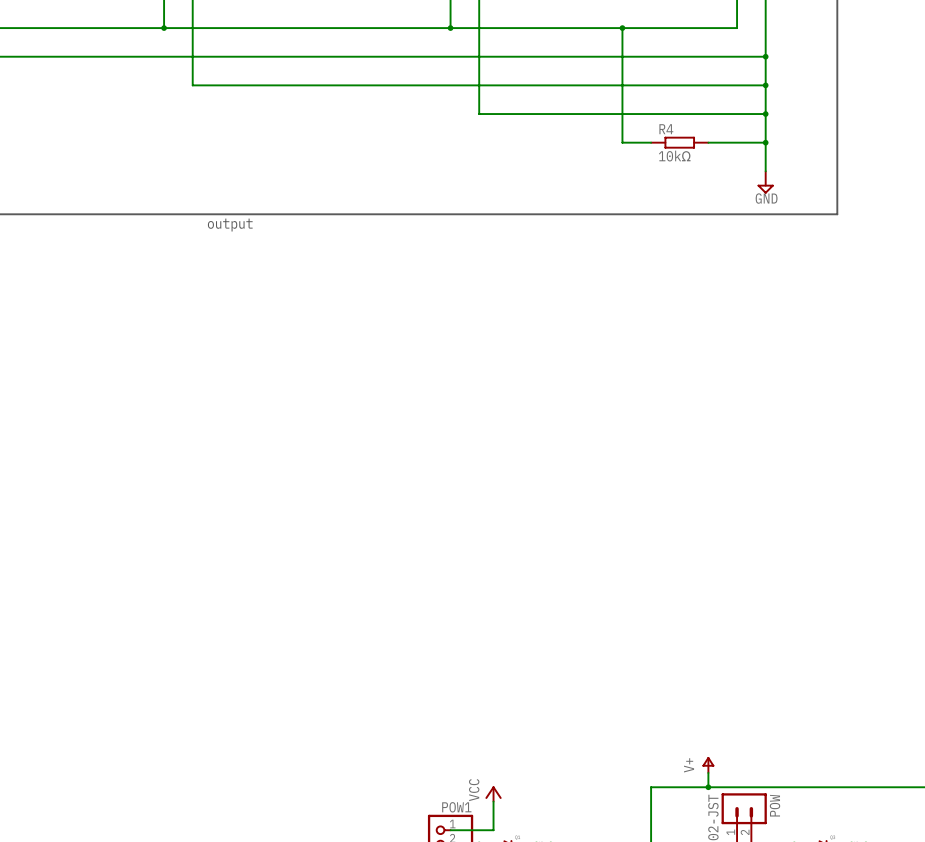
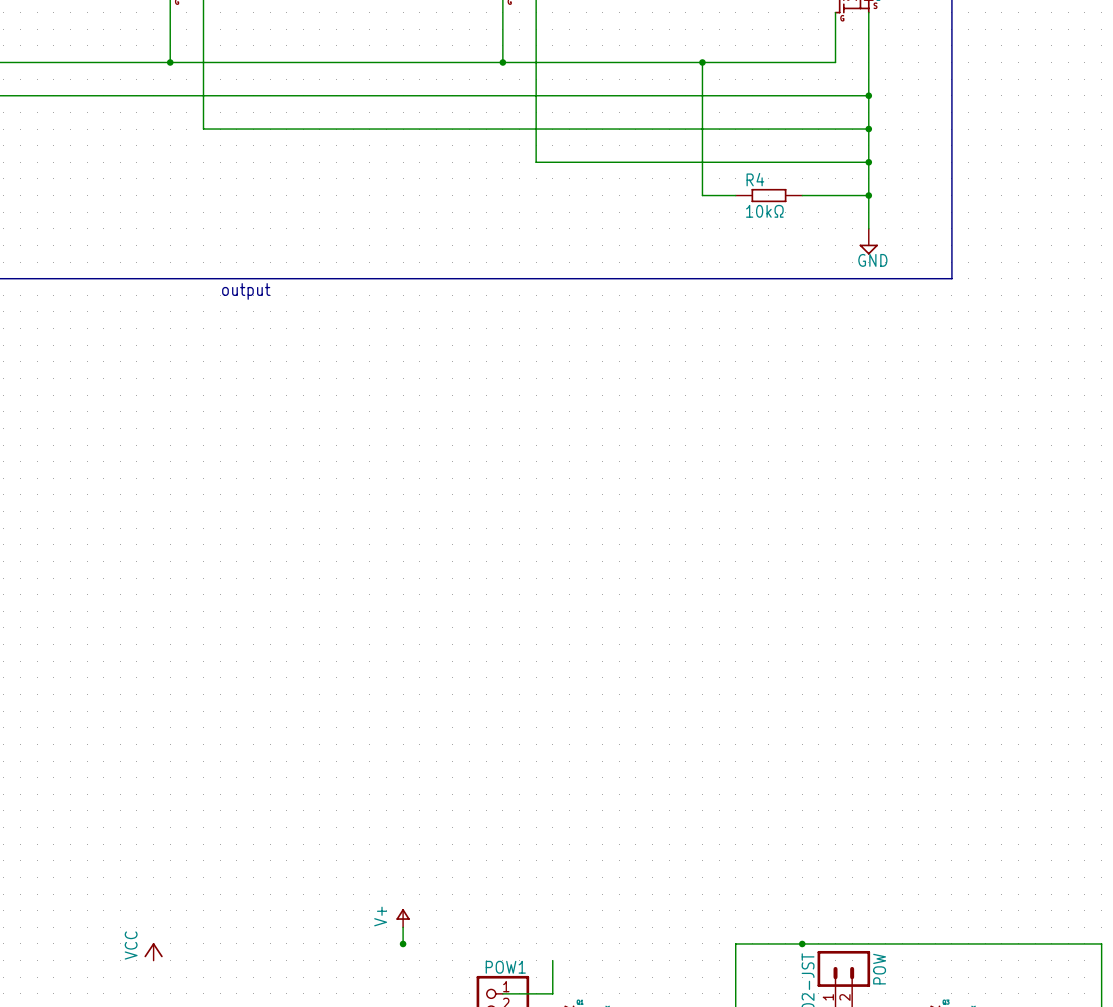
power symbol: none -> V+ (403, 918)
power symbol: V+ (708, 765) -> none
wire: none -> (403, 927) (403, 943)
wire: (708, 772) (708, 787) -> none
junction: none -> (403, 943)
power symbol: none -> VCC (153, 951)
power symbol: VCC (493, 794) -> none

